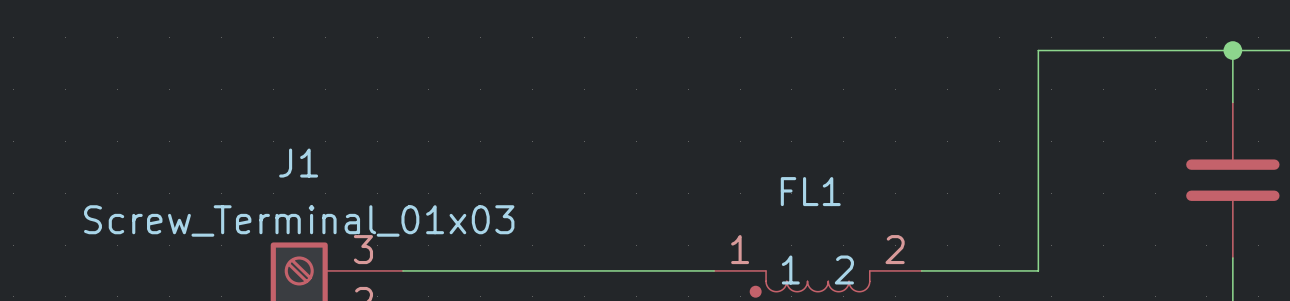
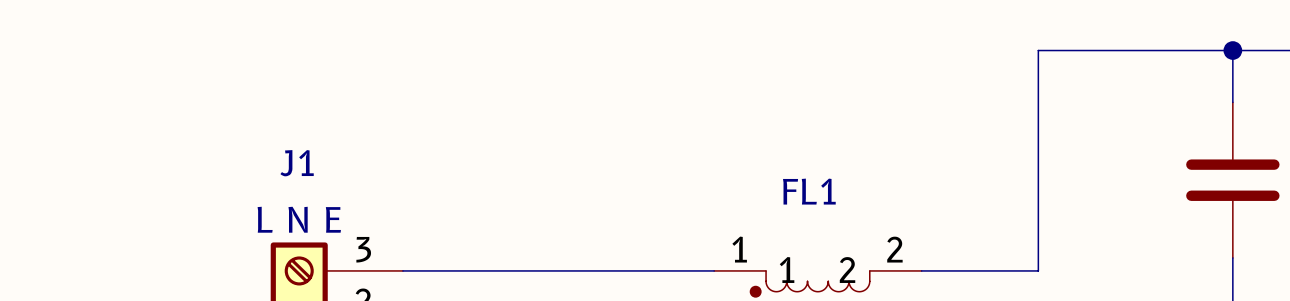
J1 value: Screw_Terminal_01x03 (299, 220) -> L N E (299, 219)

